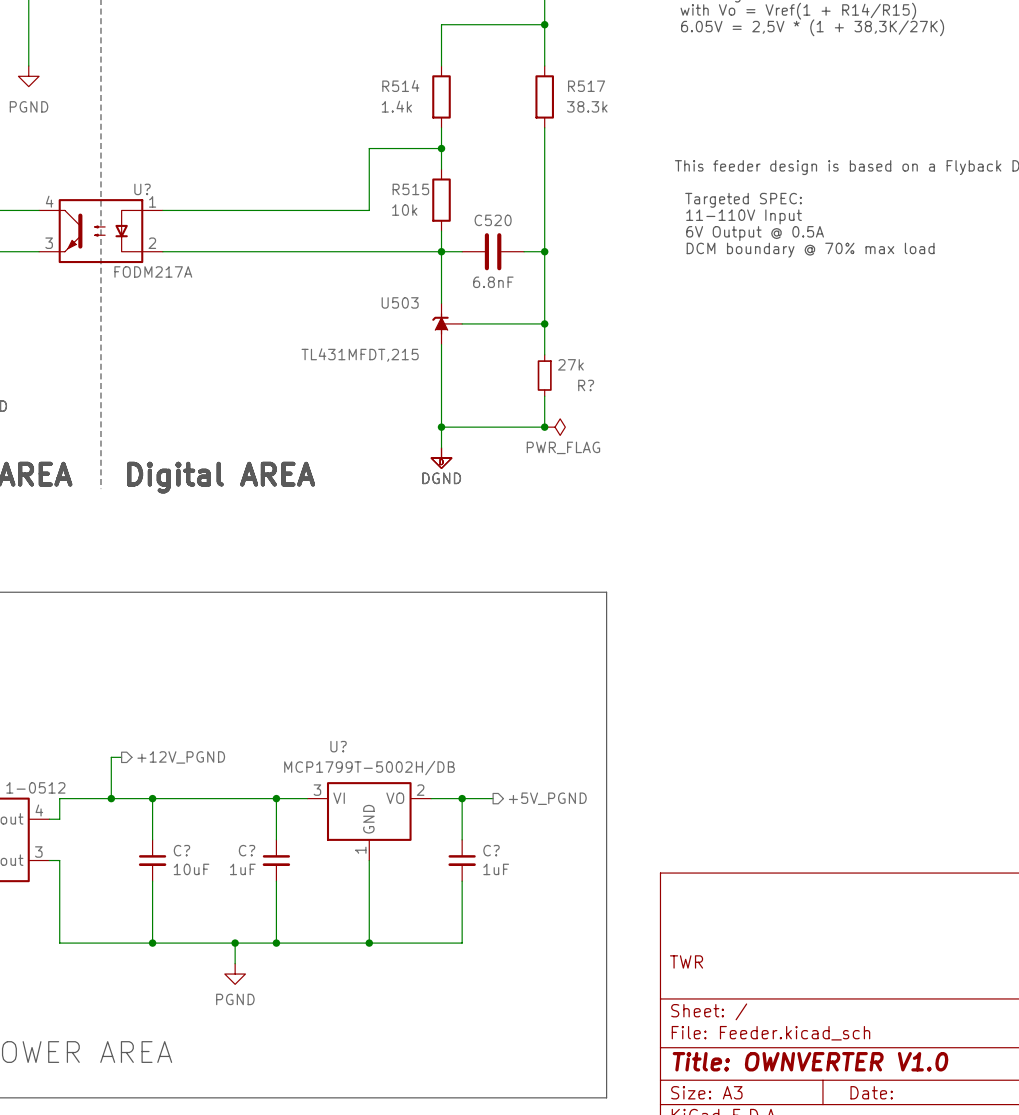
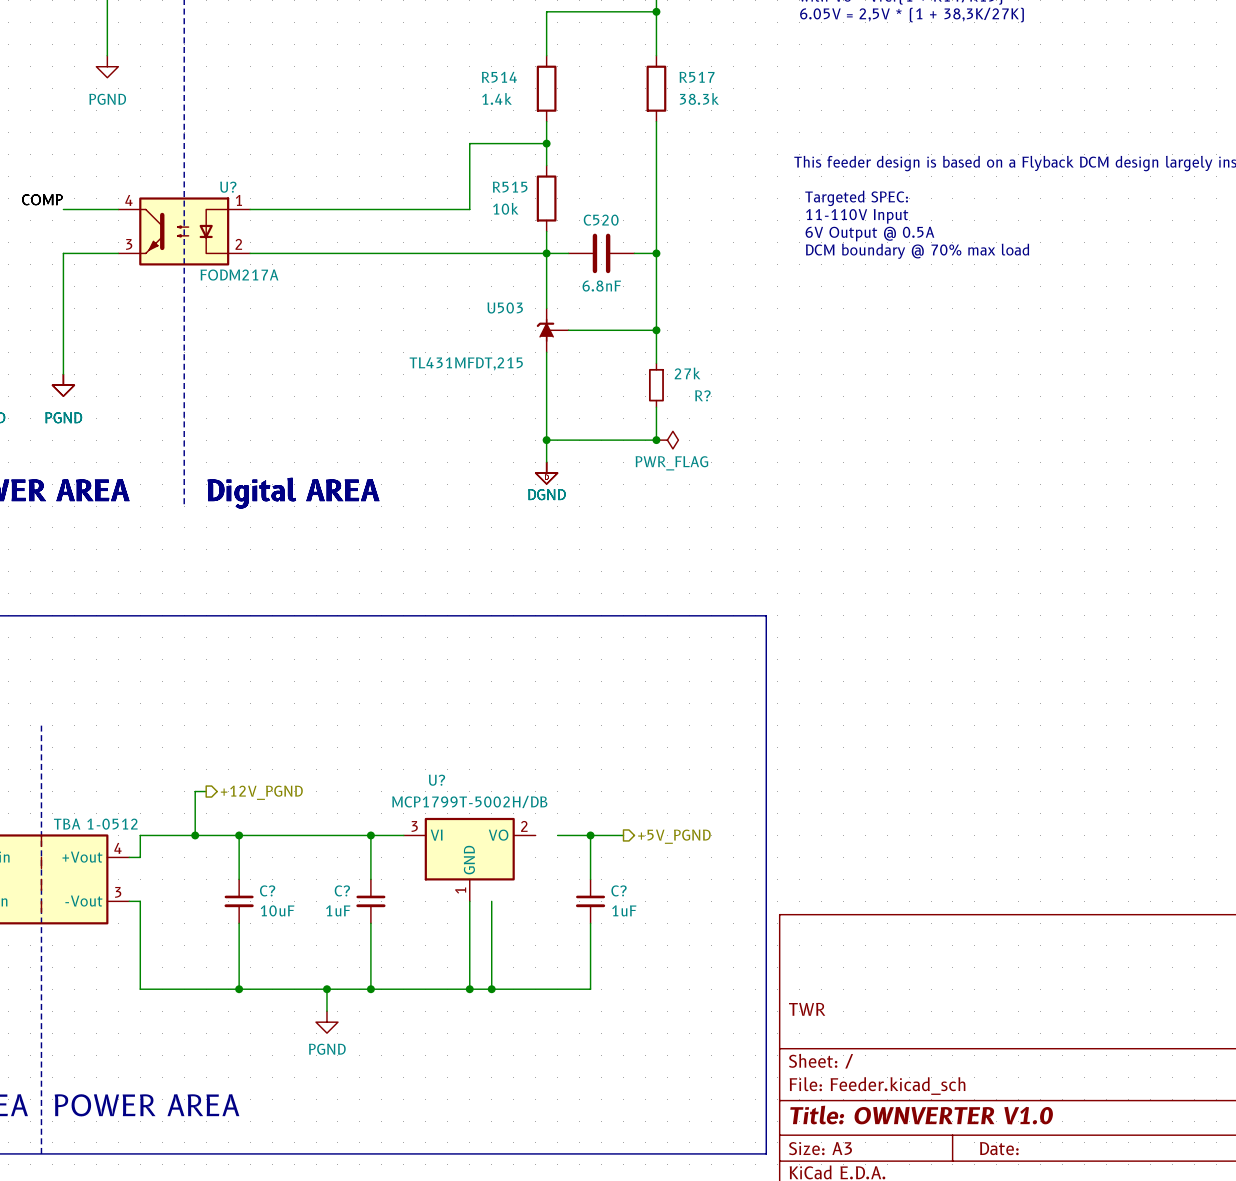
line: (606, 592) (606, 1097) -> (722, 615) (766, 615) (766, 1153) (722, 1153)
wire: (431, 798) (451, 798) -> (601, 835) (623, 835)
wire: (462, 798) (462, 839) -> (590, 835) (590, 879)
junction position: (462, 798) -> (590, 835)
hierarchical label position: +5V_PGND (547, 798) -> +5V_PGND (674, 836)
wire: none -> (491, 901) (491, 989)
C? position: (462, 860) -> (590, 901)
wire: (462, 881) (462, 943) -> (590, 923) (590, 989) (568, 989)
junction: none -> (491, 989)

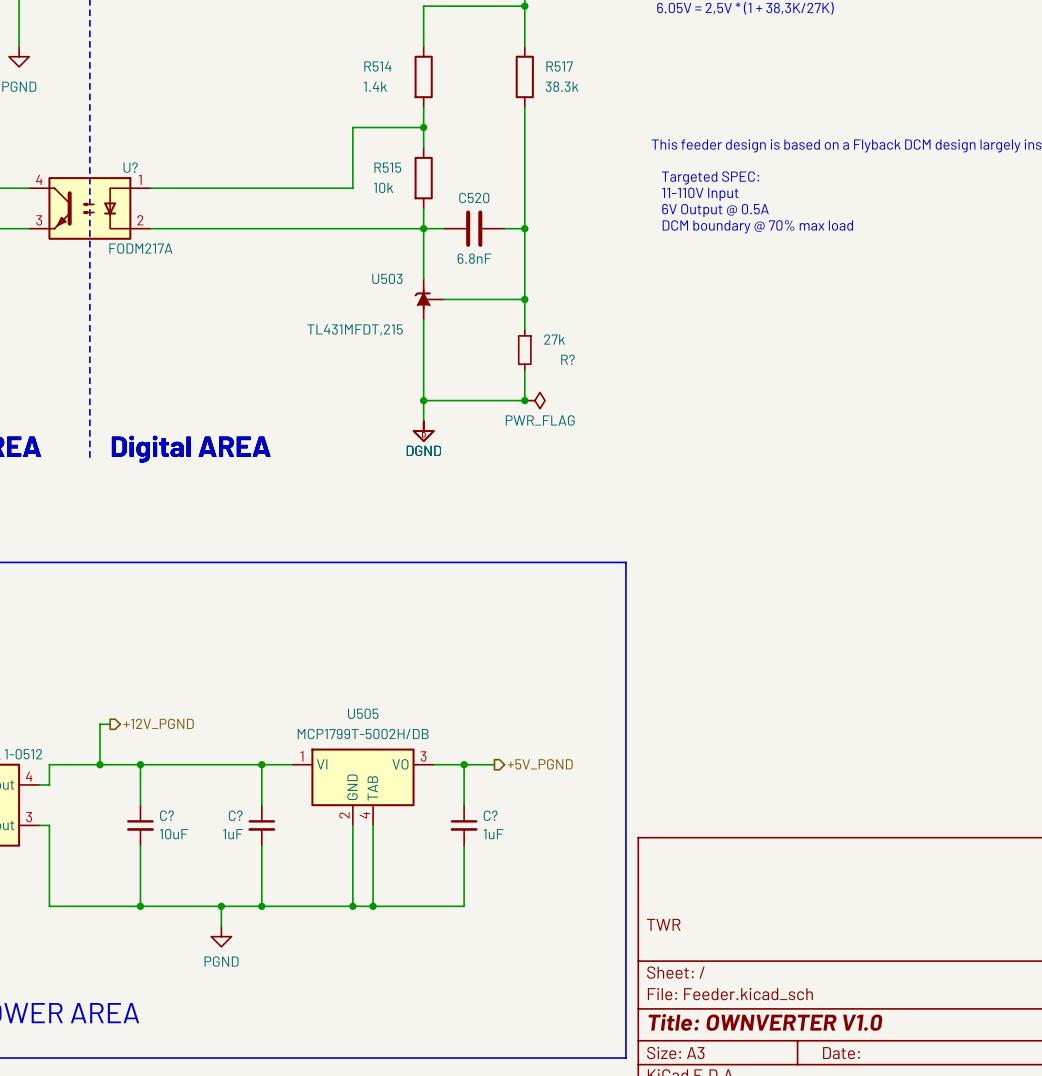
U?: MCP1799T-5002H/DB (469, 859) -> none
U505: none -> MCP1799T-5002H/DB (362, 786)

